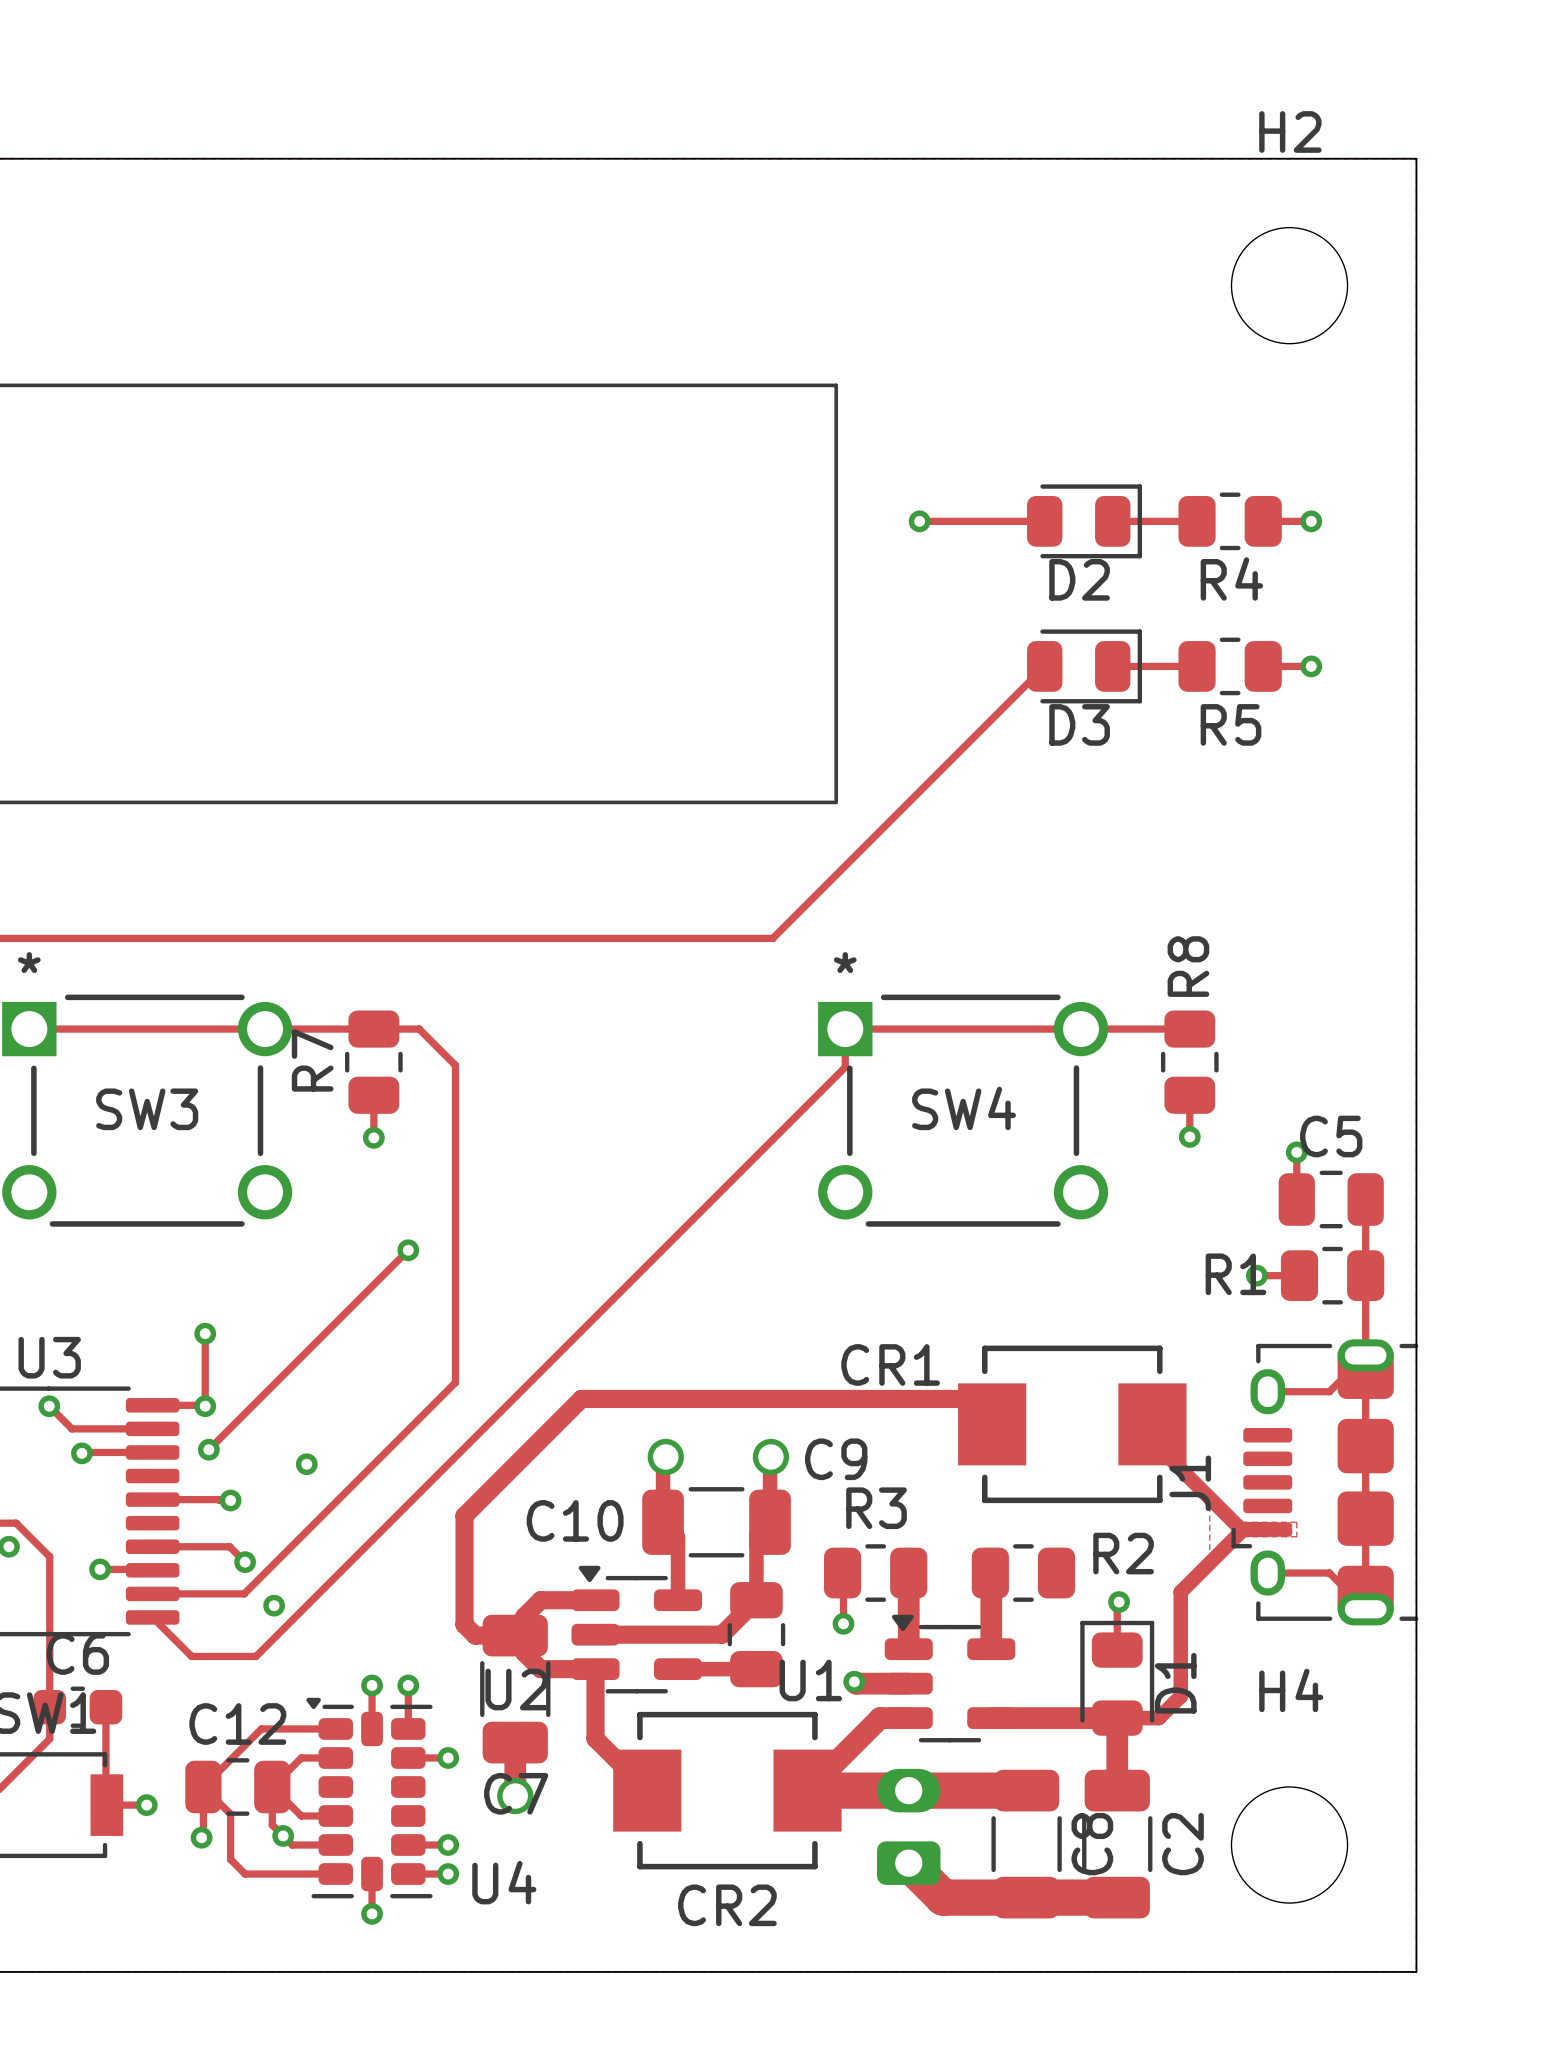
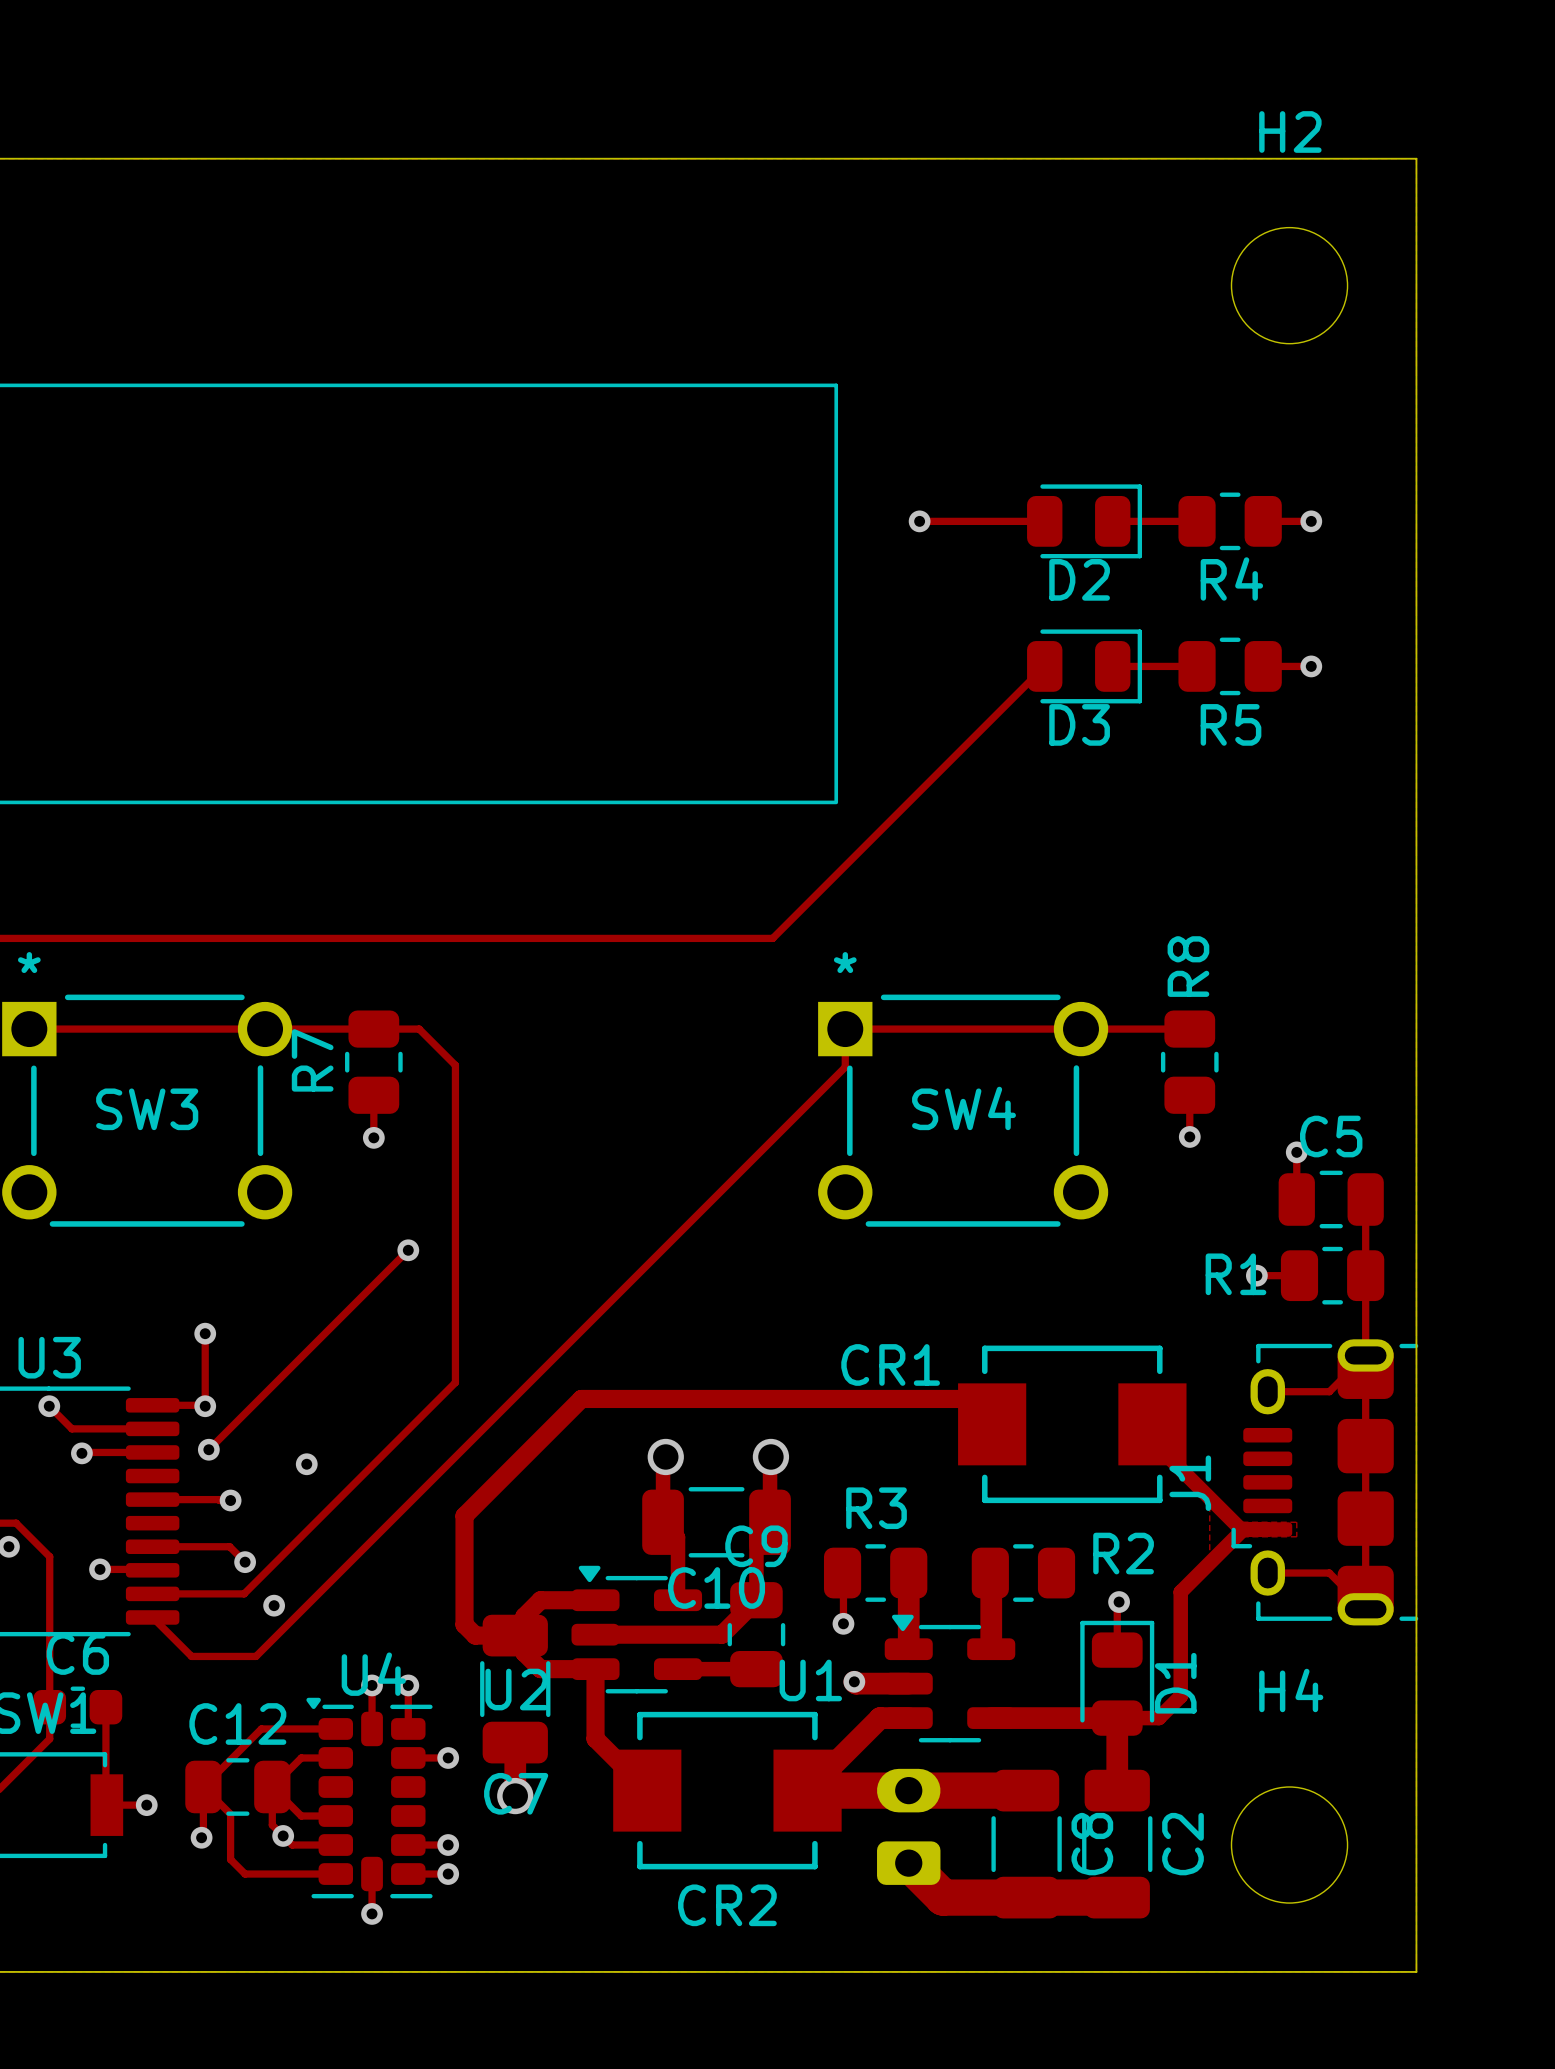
C9 name position: C9 (836, 1459) -> C9 (756, 1546)
C10 name position: C10 (575, 1520) -> C10 (716, 1587)
U4 name position: U4 (504, 1882) -> U4 (373, 1674)

